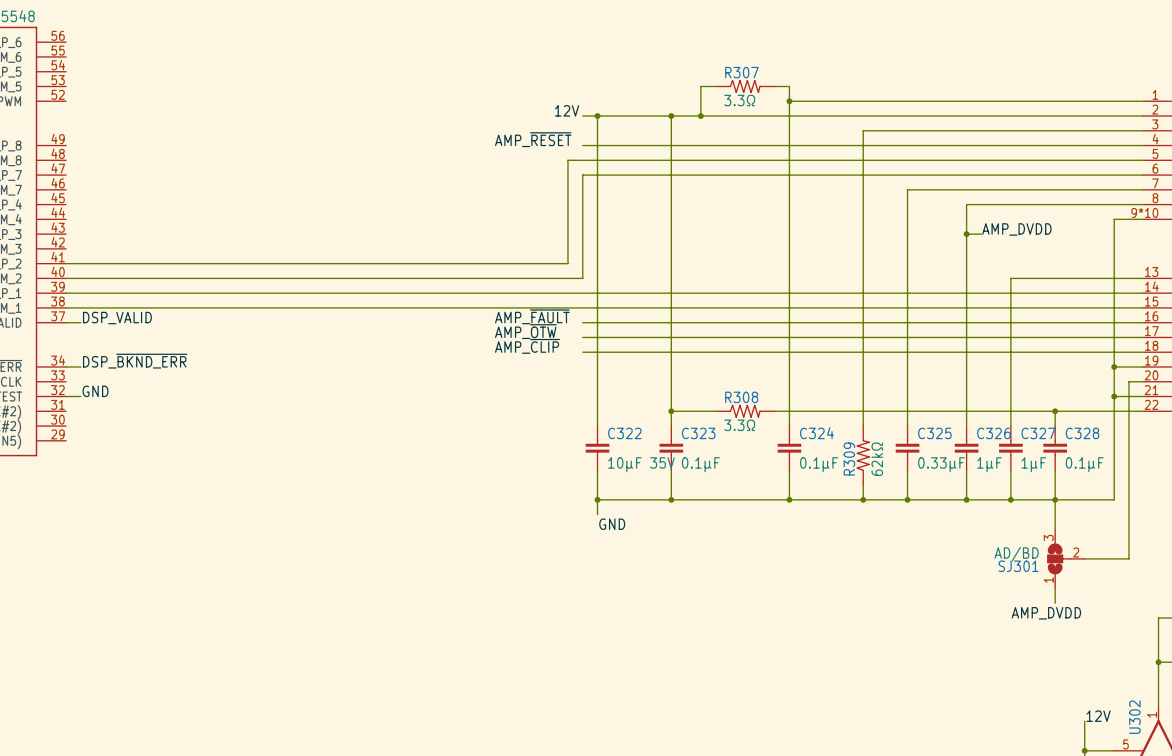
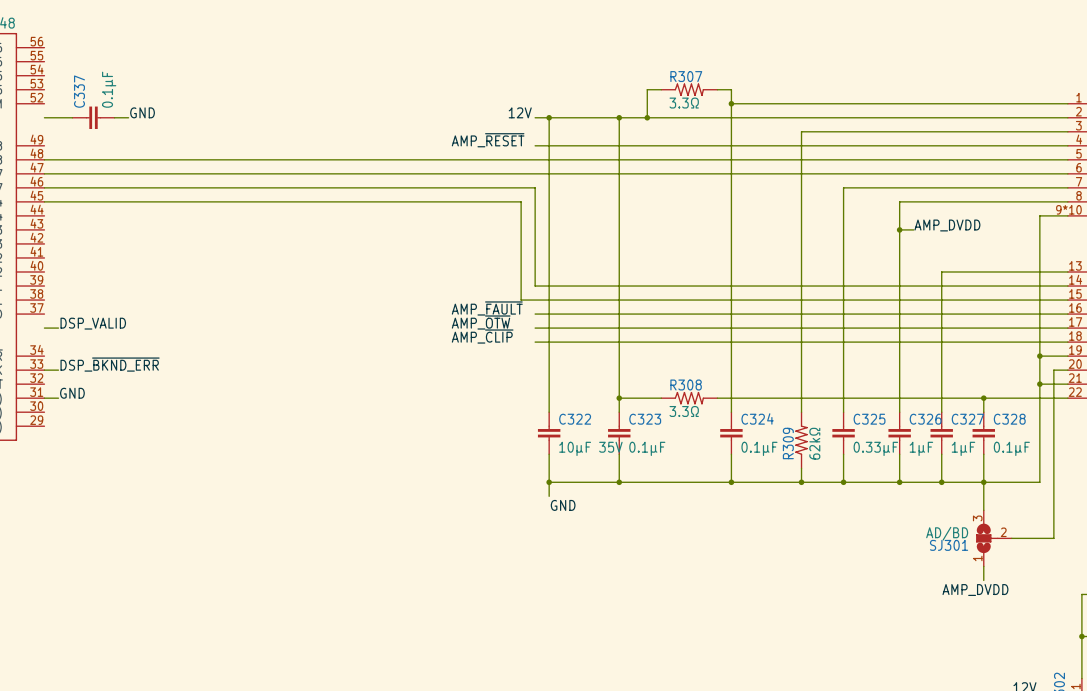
label: none -> GND (142, 112)
wire: none -> (44, 117) (72, 117)
C337: none -> 0.1µF (93, 117)
wire: none -> (114, 117) (128, 117)
wire: (567, 160) (567, 204) -> (521, 159) (44, 159)
wire: (582, 175) (582, 189) -> (535, 173) (44, 173)
wire: (66, 263) (567, 263) -> (521, 300) (521, 257)
wire: (66, 278) (582, 278) -> (535, 286) (535, 271)
wire: (66, 293) (582, 293) -> (44, 187) (535, 187)
wire: (66, 307) (567, 307) -> (44, 201) (521, 201)
label position: DSP_VALID (117, 318) -> DSP_VALID (93, 323)
wire: (66, 322) (80, 322) -> (44, 328) (58, 328)
label position: DSP_~{BKND_ERR} (135, 361) -> DSP_~{BKND_ERR} (110, 364)
wire: (66, 366) (80, 366) -> (44, 370) (58, 370)
label position: GND (95, 391) -> GND (72, 393)
wire: (66, 396) (80, 396) -> (44, 398) (58, 398)

